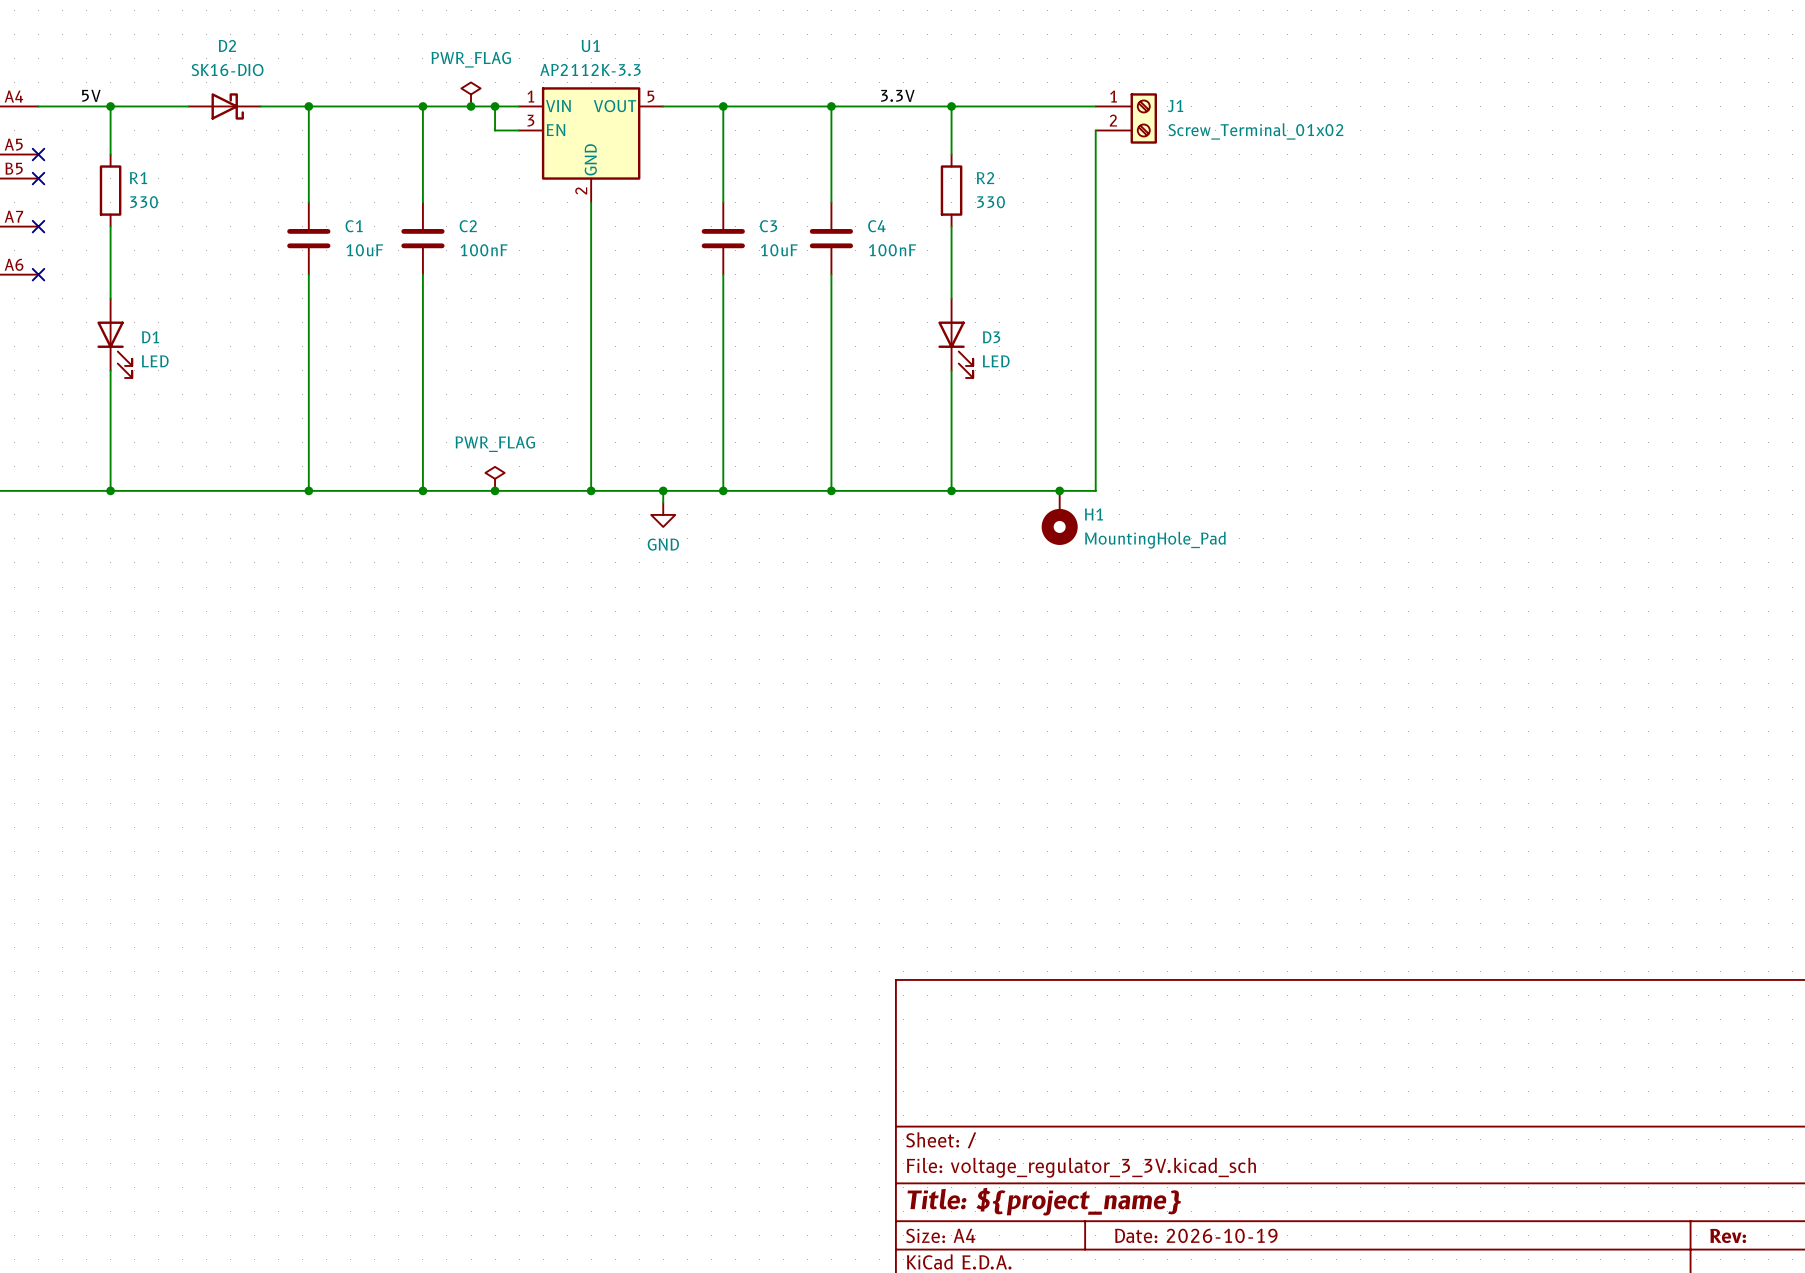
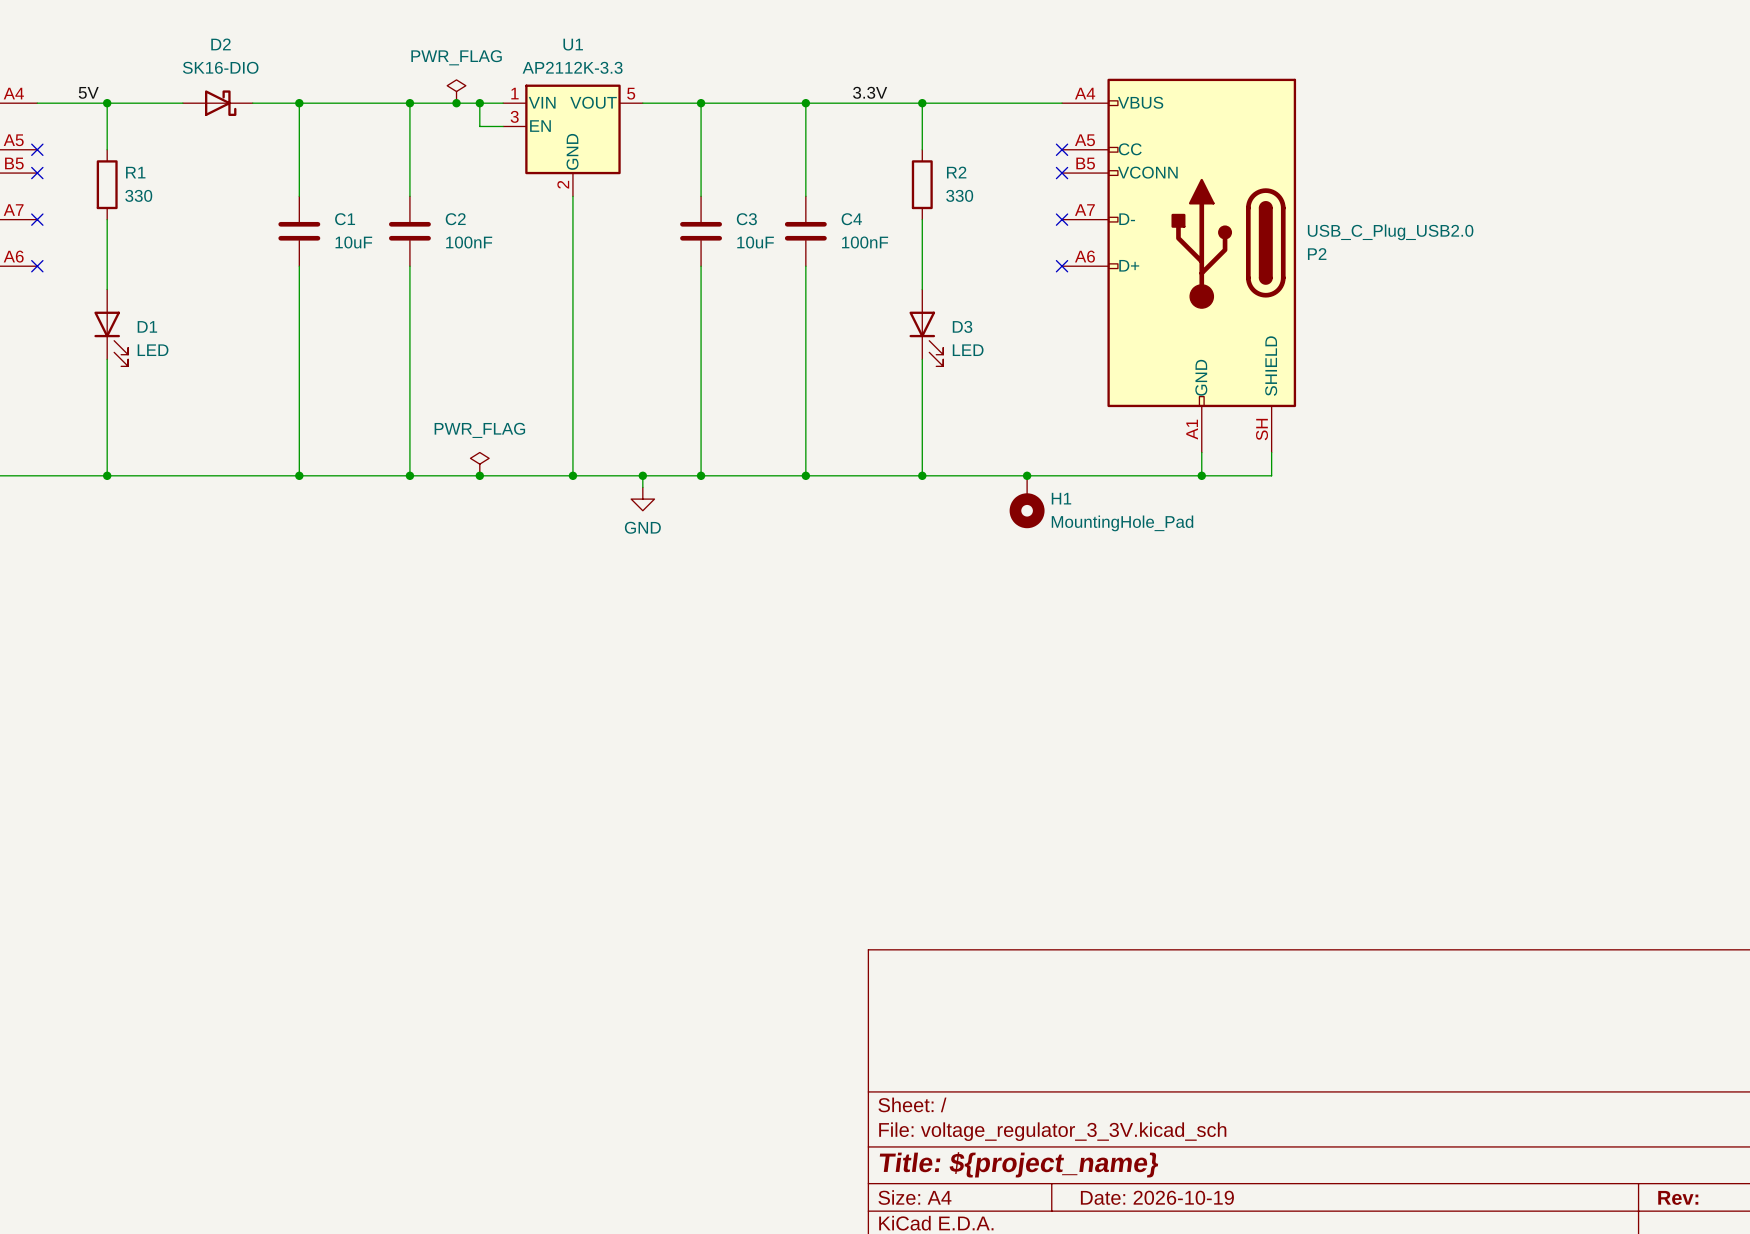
J1: Screw_Terminal_01x02 (1126, 118) -> none
wire: (1095, 130) (1095, 490) -> (1271, 452) (1271, 475) (1062, 475)
no-connect mark: none -> (1062, 149)
no-connect mark: none -> (1062, 173)
no-connect mark: none -> (1062, 219)
no-connect mark: none -> (1062, 266)
P2: none -> USB_C_Plug_USB2.0 (1179, 265)
wire: none -> (1201, 452) (1201, 475)
junction: none -> (1201, 475)

